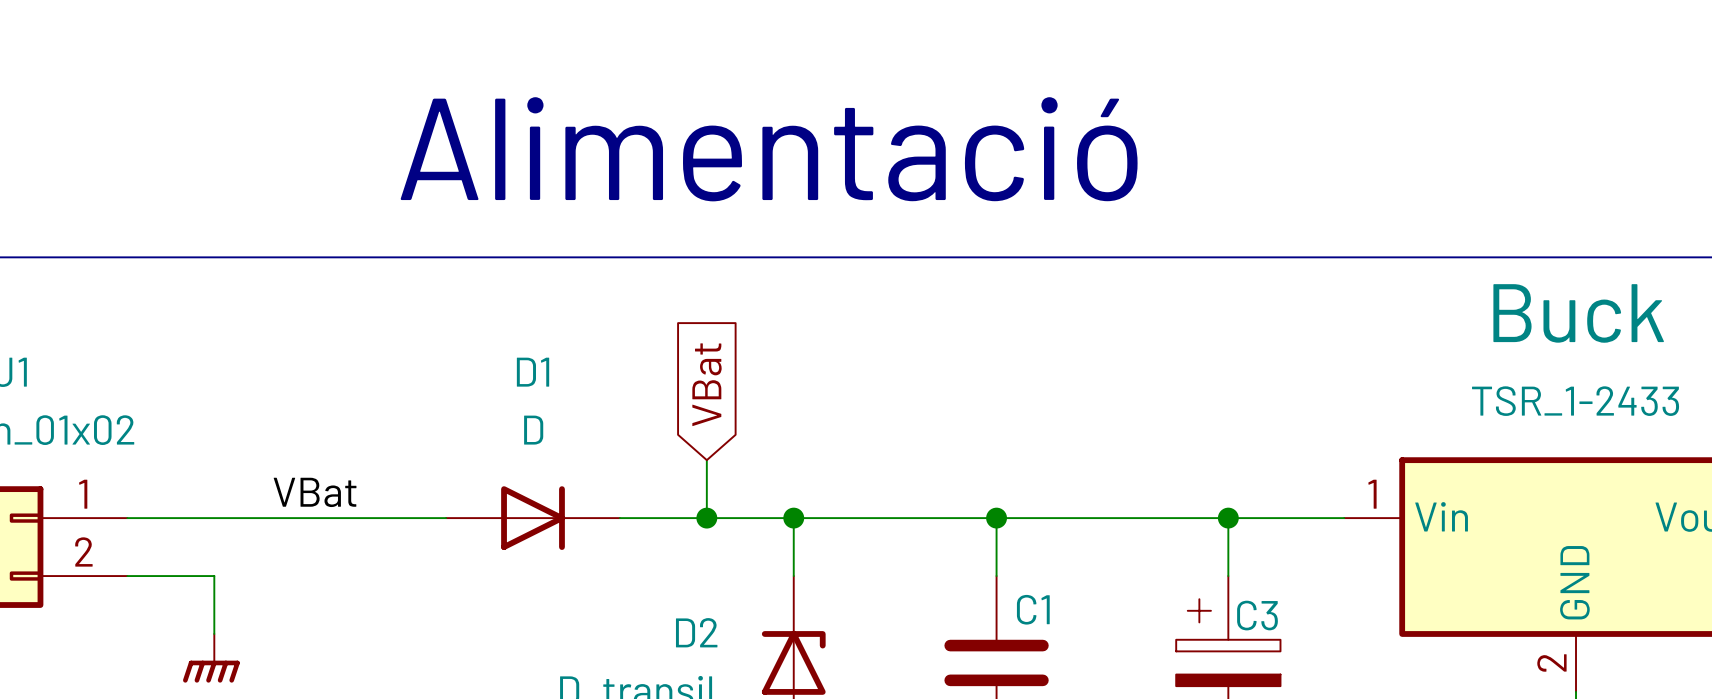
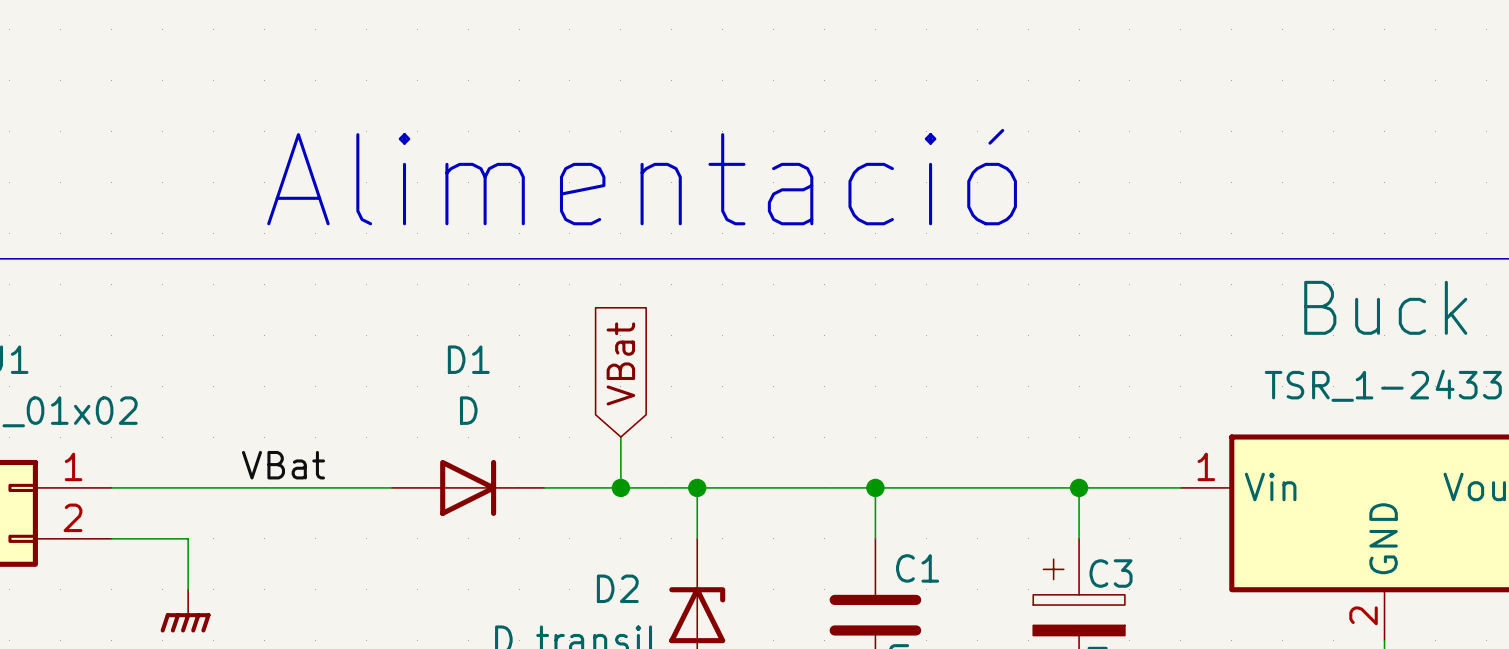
text position: Alimentació (768, 149) -> Alimentació (642, 177)

